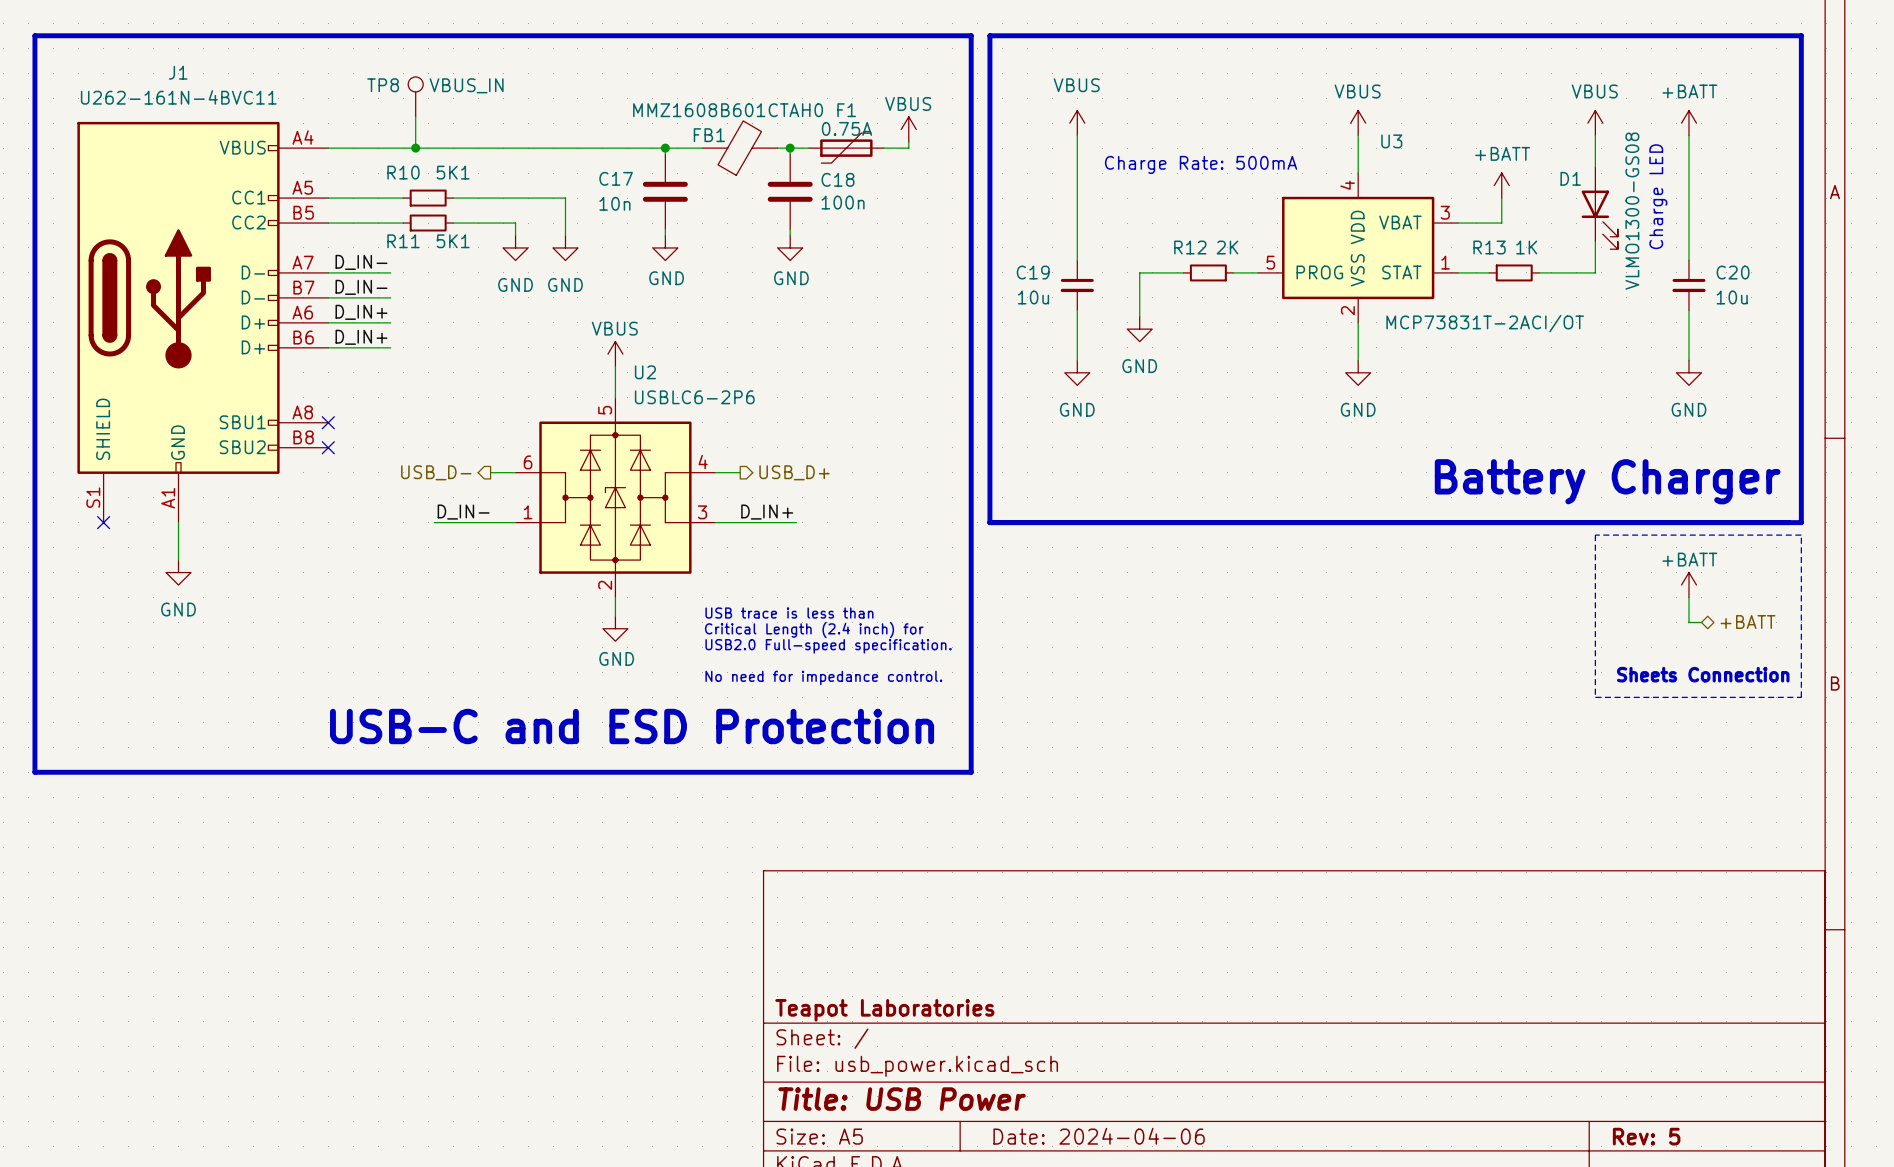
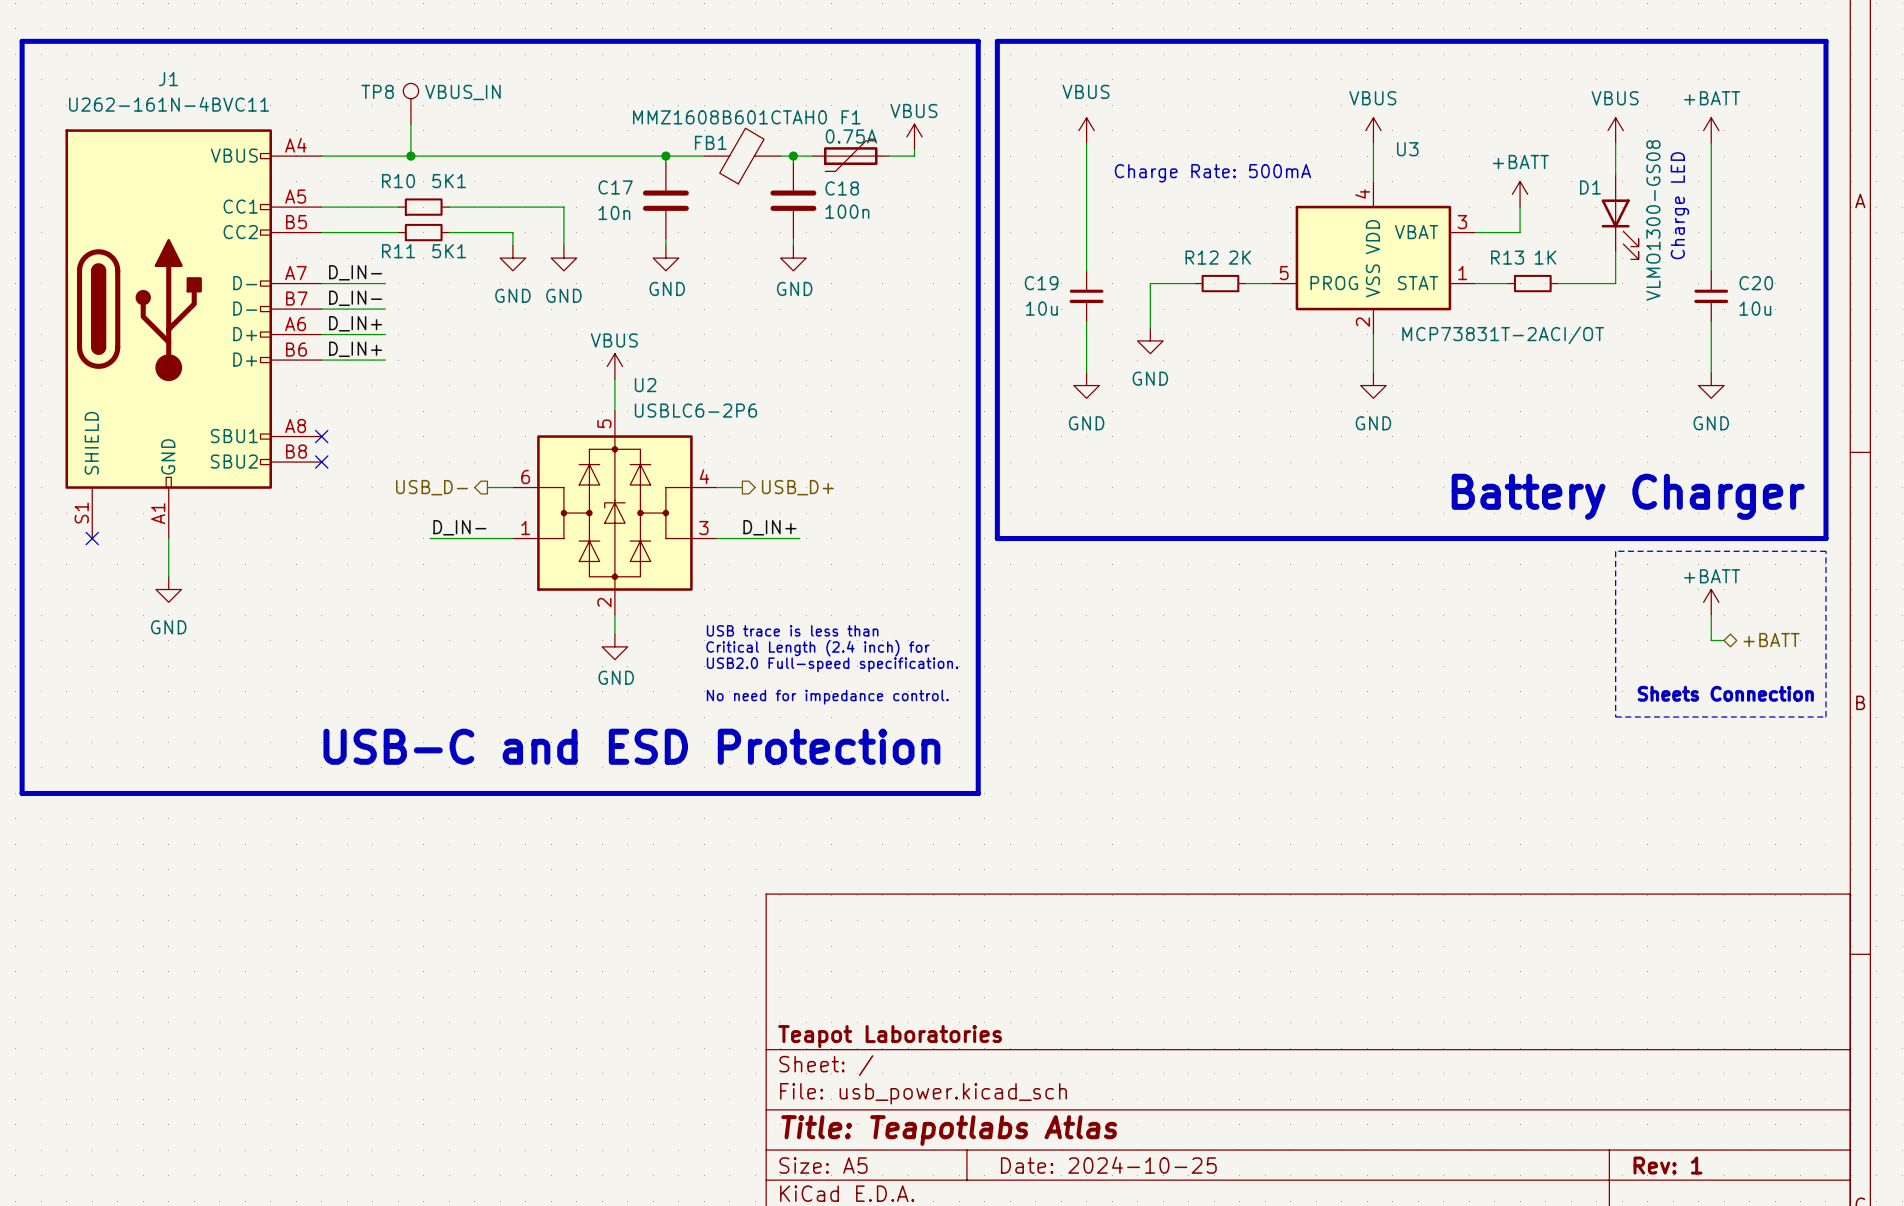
title block: Title: USB Power (902, 1099) -> Title: Teapotlabs Atlas (949, 1130)
title block: Date: 2024-04-06 (1099, 1136) -> Date: 2024-10-25 (1108, 1165)
title block: Rev: 5 (1646, 1136) -> Rev: 1 (1668, 1165)

